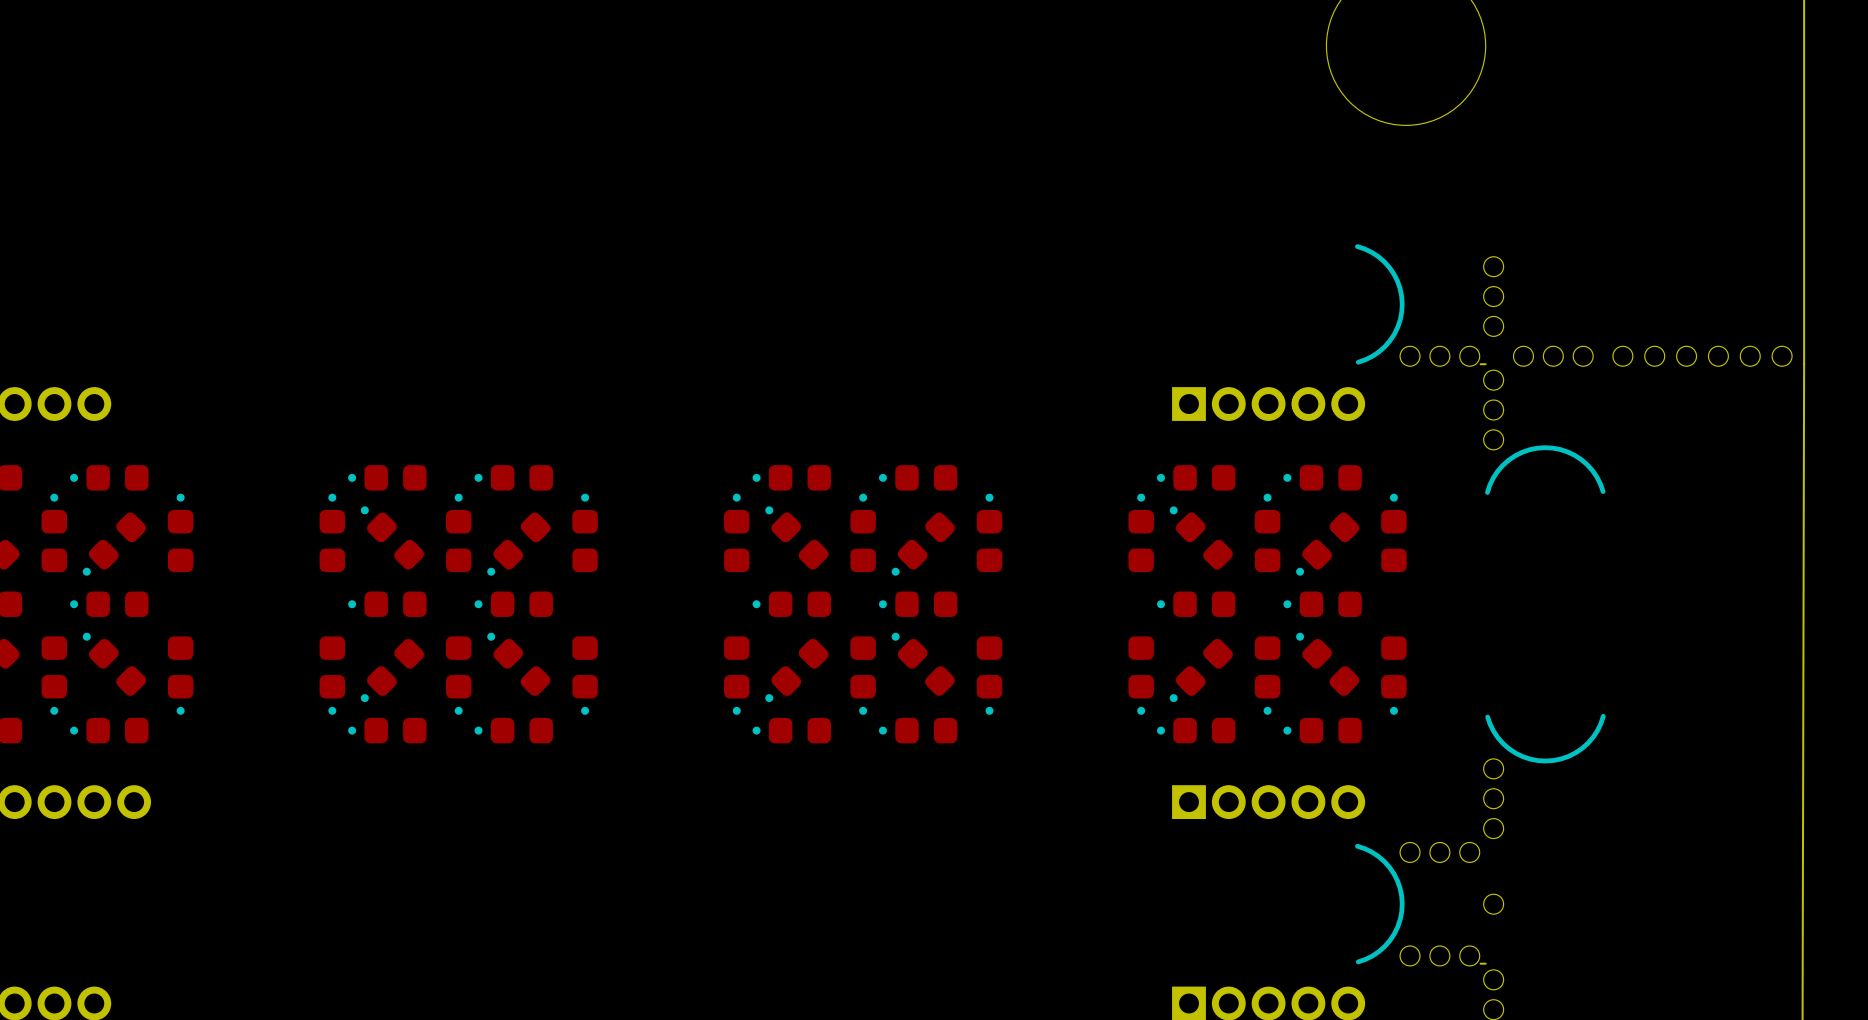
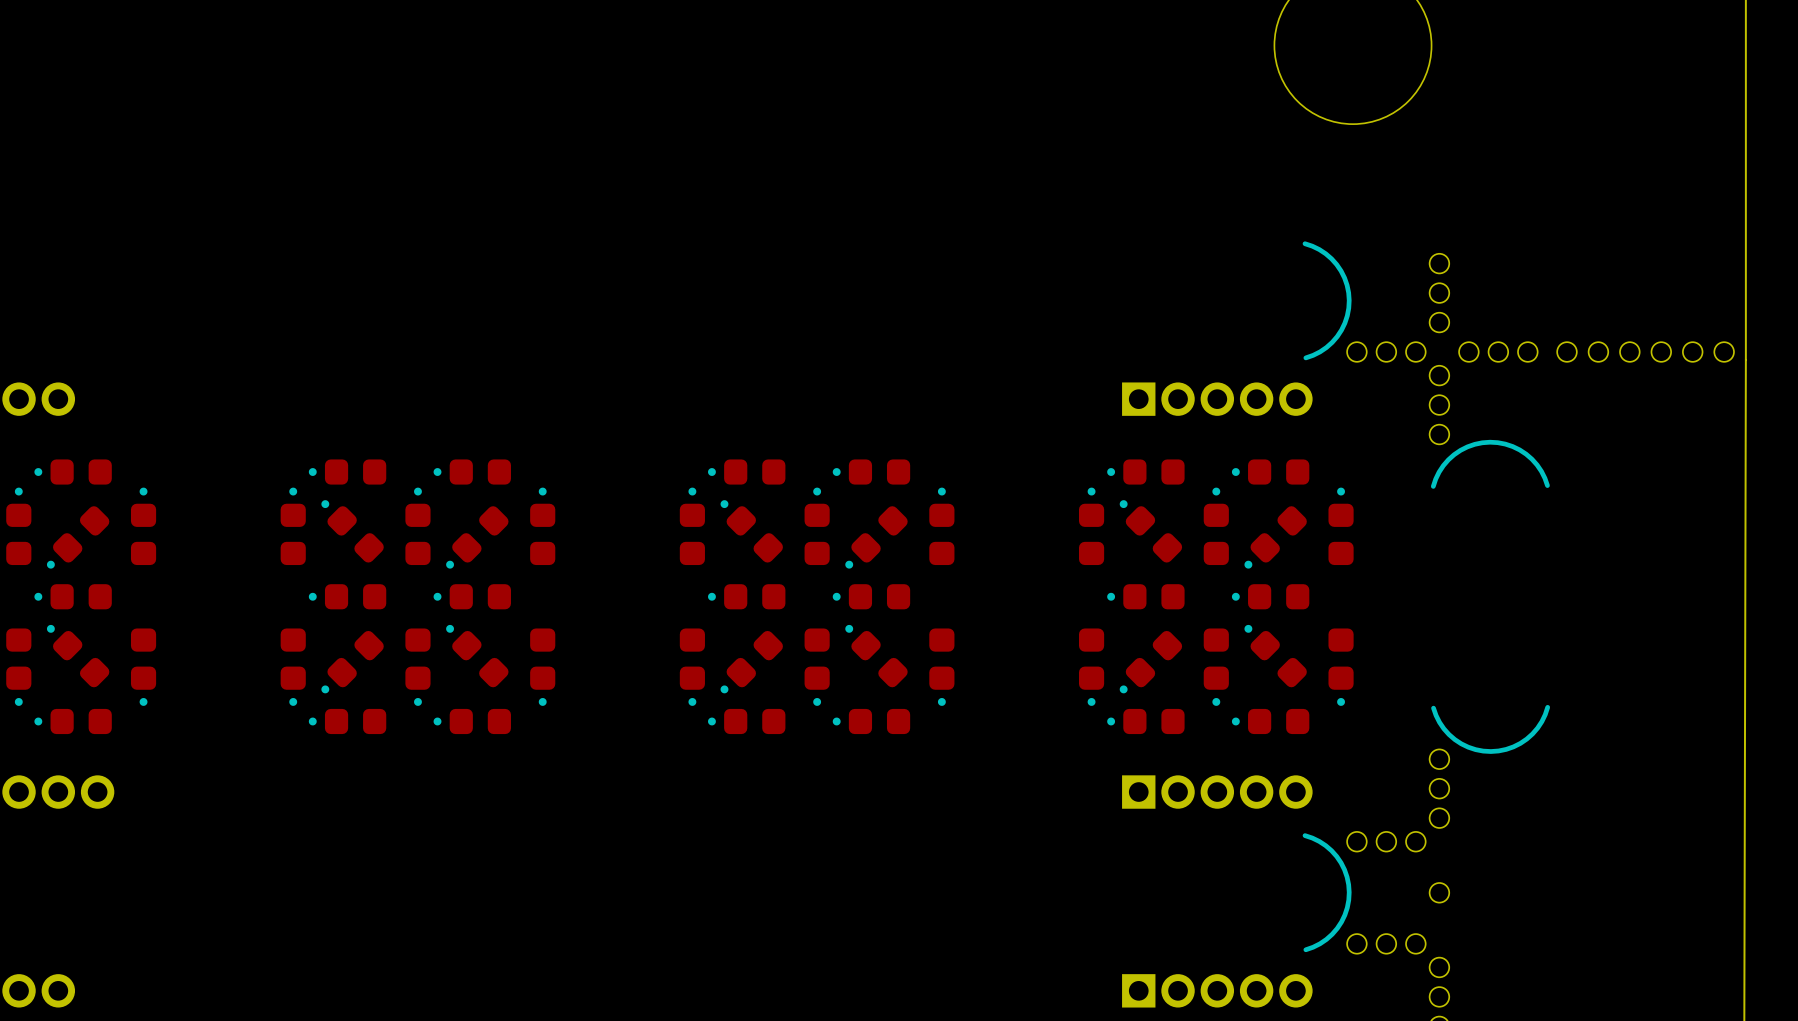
board edge: (1480, 364) (1485, 364) -> none
board edge: (1480, 963) (1485, 963) -> none

